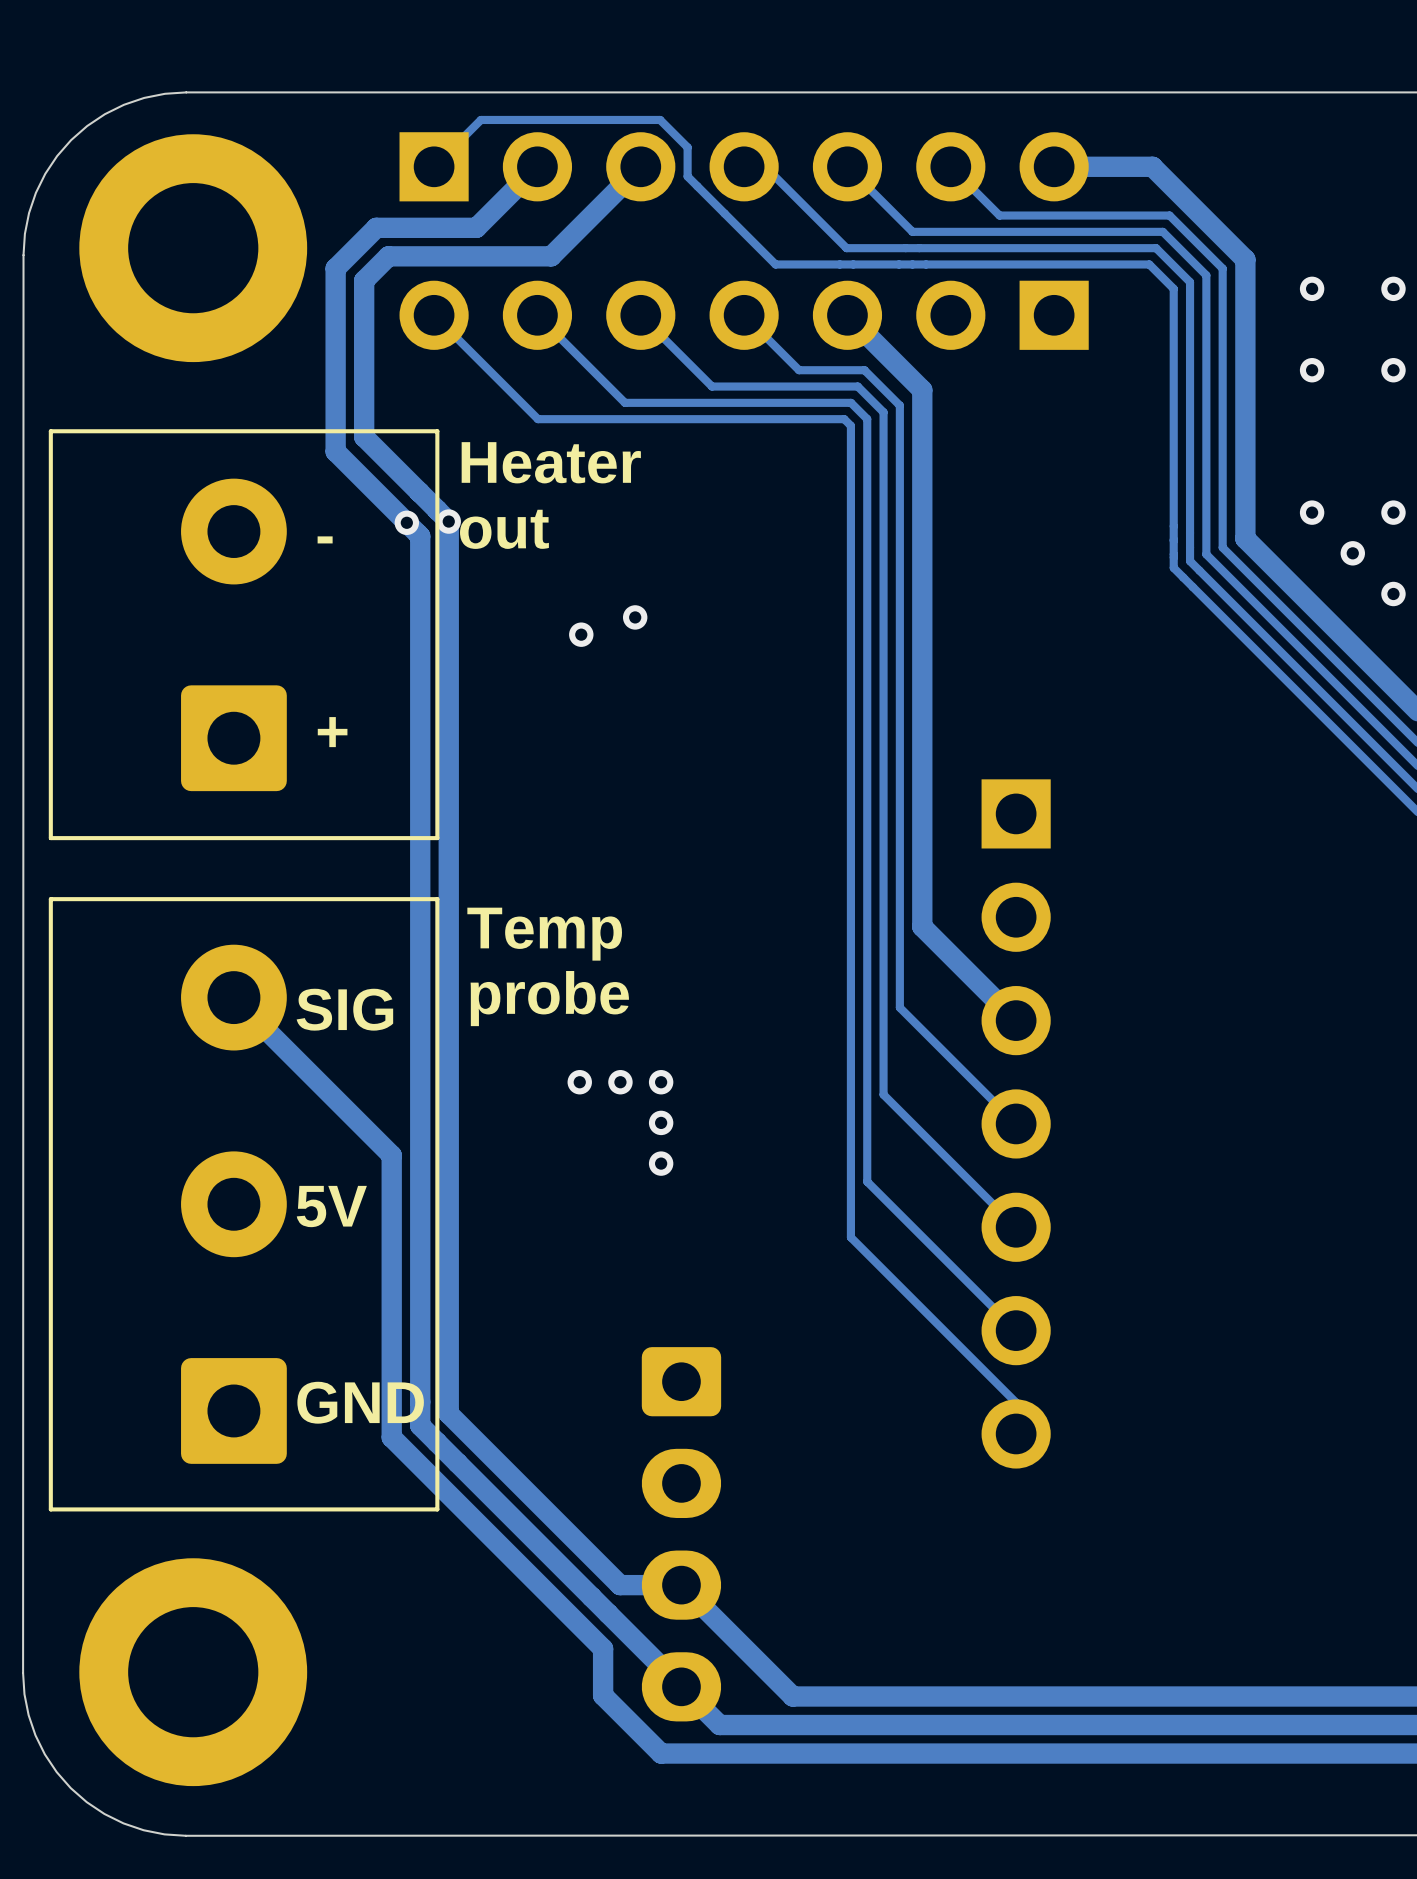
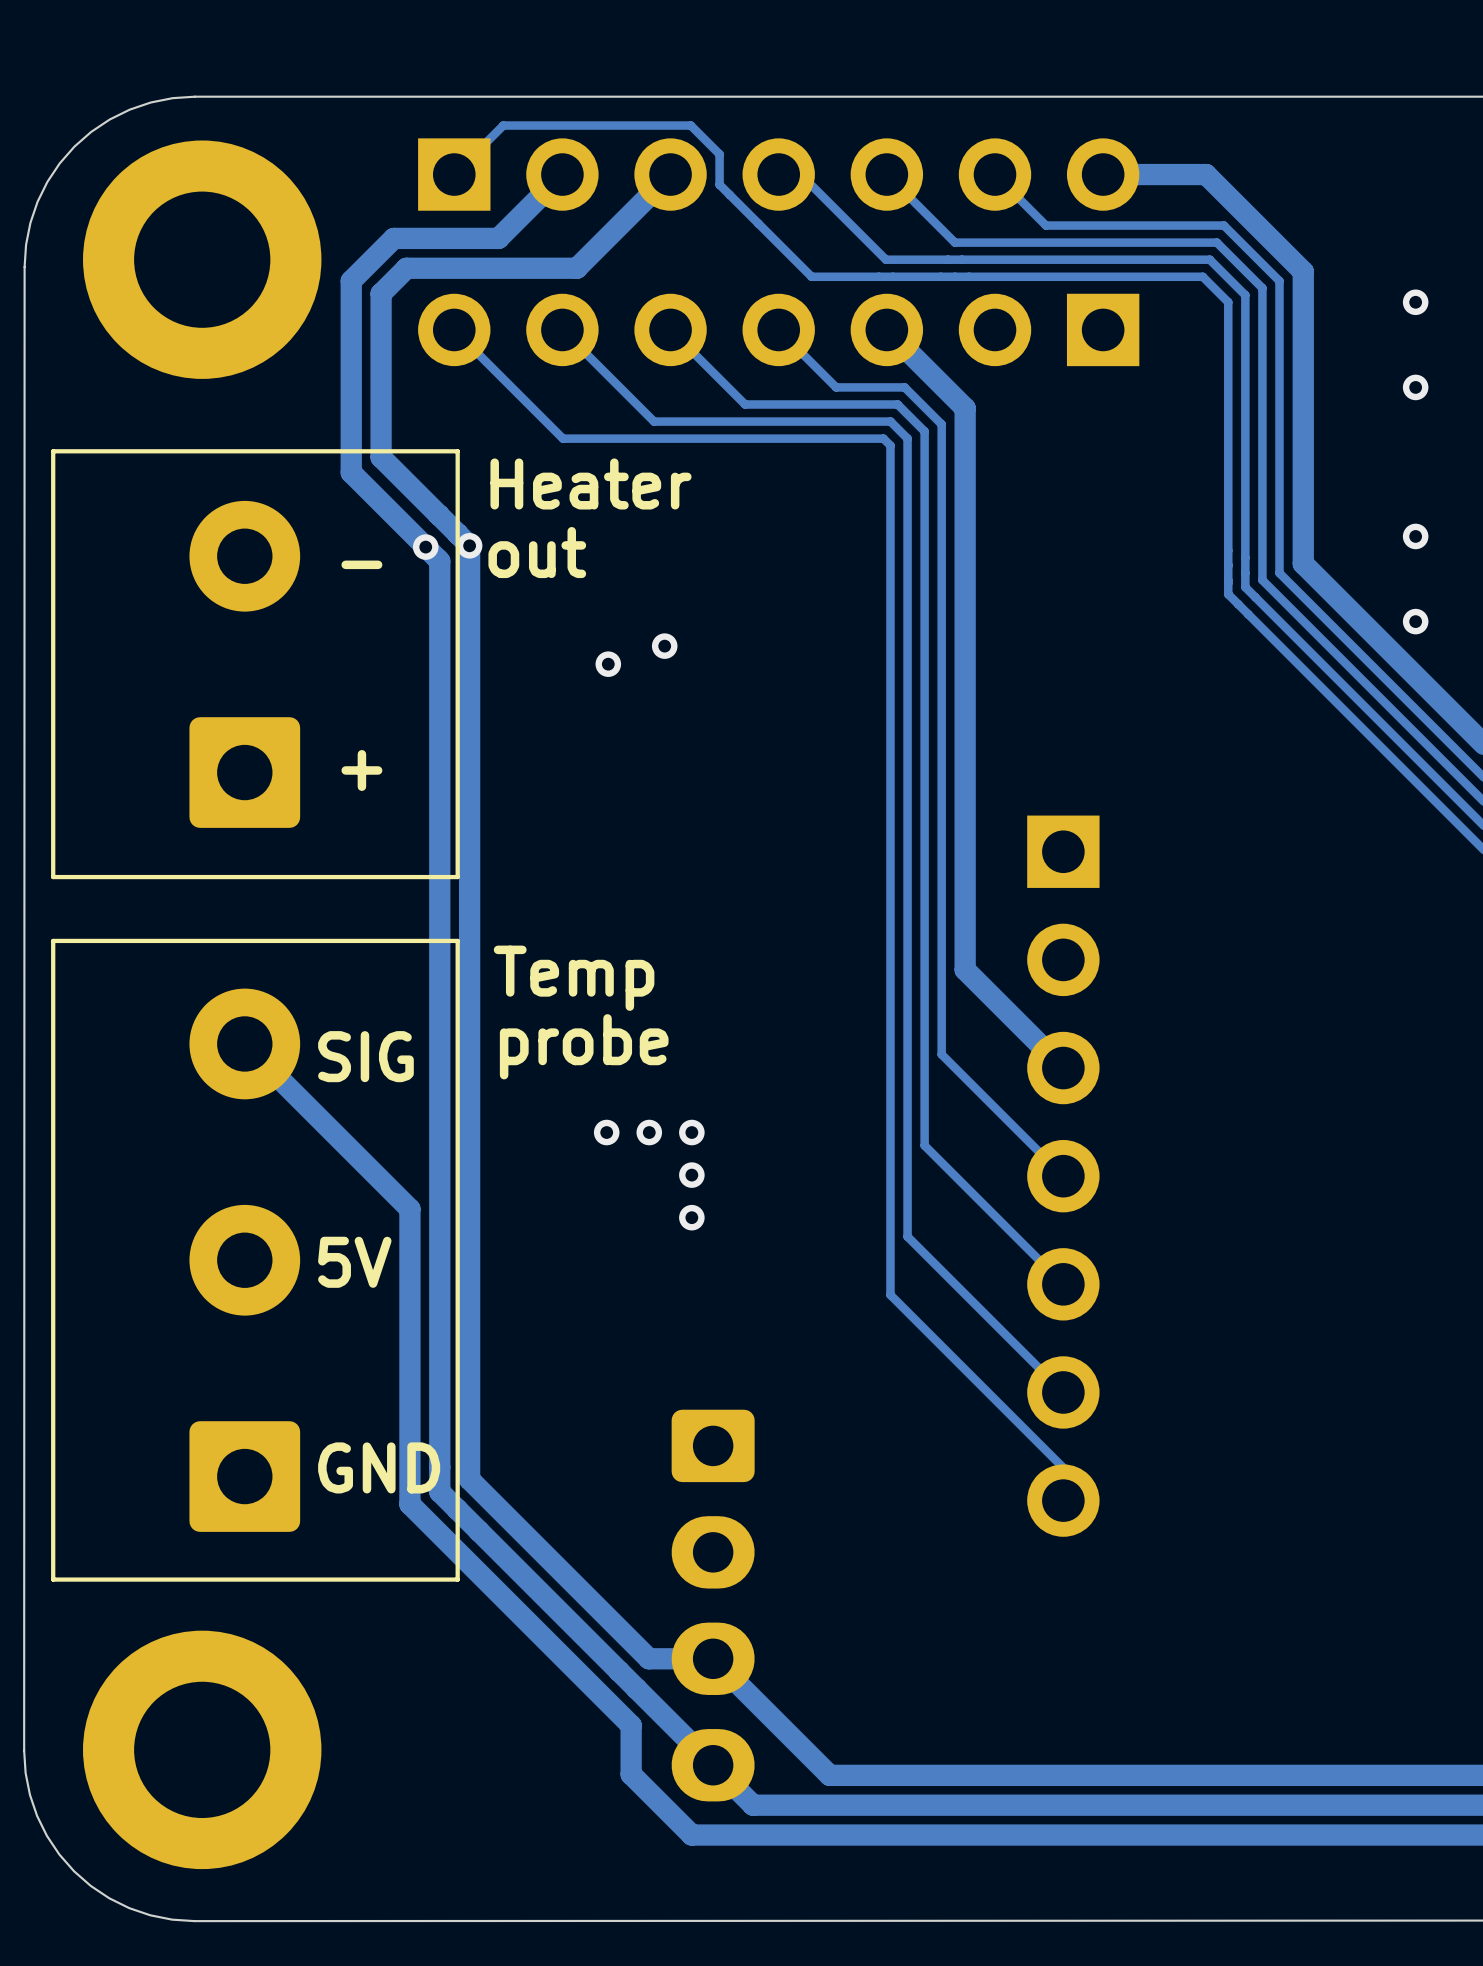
via: (1312, 288) -> none
via: none -> (1415, 302)
via: (1393, 288) -> none
via: (1312, 370) -> none
via: none -> (1415, 387)
via: (1393, 370) -> none
via: (1312, 512) -> none
via: none -> (1415, 536)
via: (1393, 512) -> none
via: (1352, 553) -> none
via: none -> (1415, 621)
via: (1393, 593) -> none

